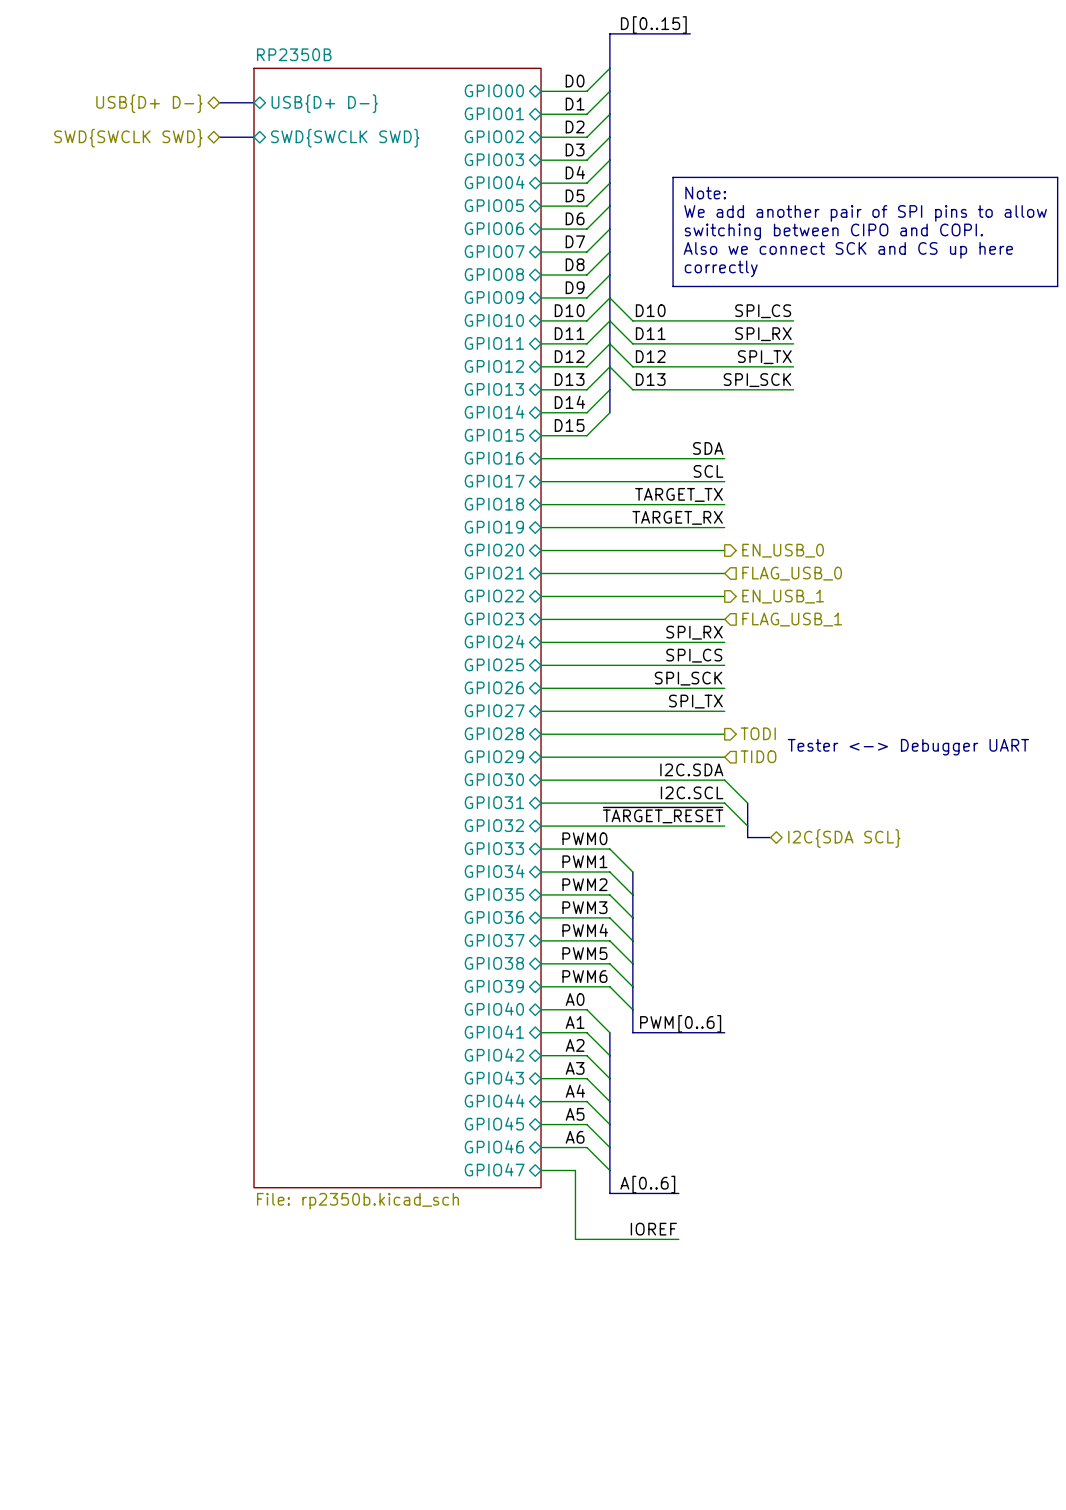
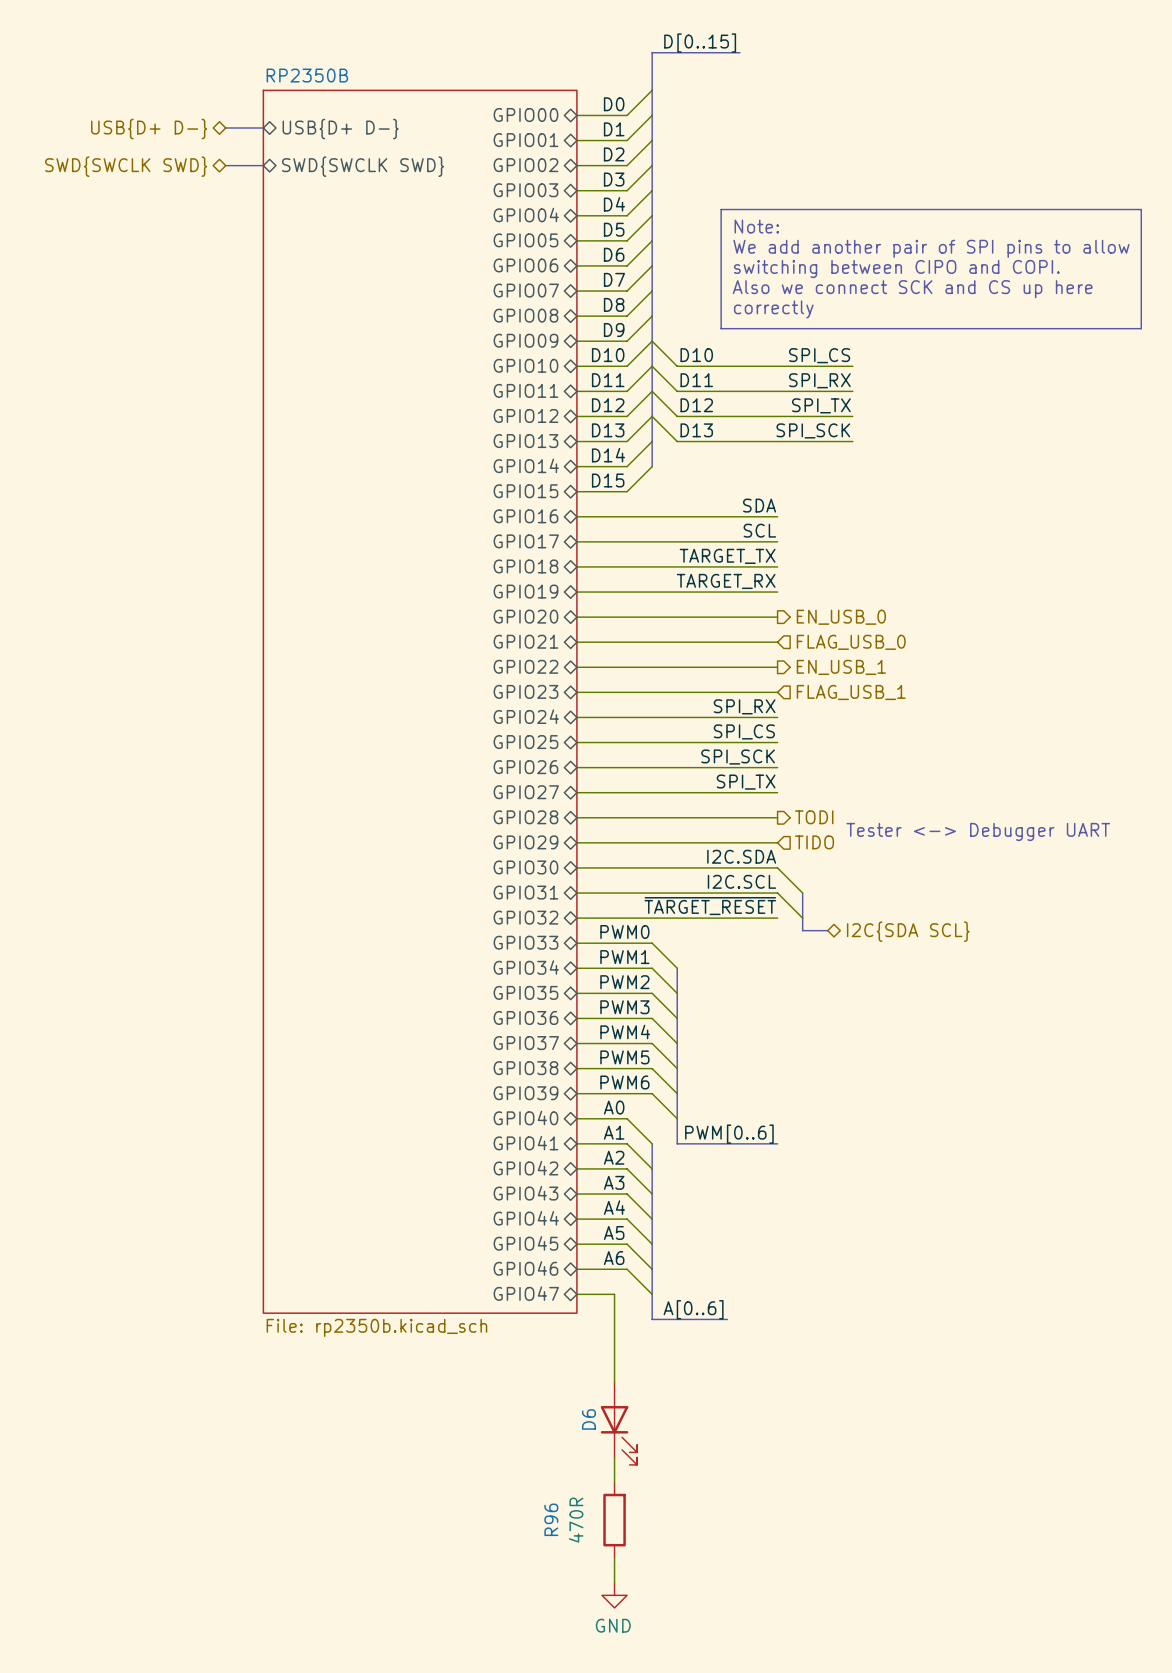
label: IOREF (653, 1229) -> none
wire: (575, 1239) (678, 1239) -> (614, 1369) (614, 1382)
D6: none -> (618, 1423)
wire: none -> (614, 1457) (614, 1482)
R96: none -> 470R (614, 1520)
wire: none -> (614, 1557) (614, 1582)
power symbol: none -> GND (614, 1595)

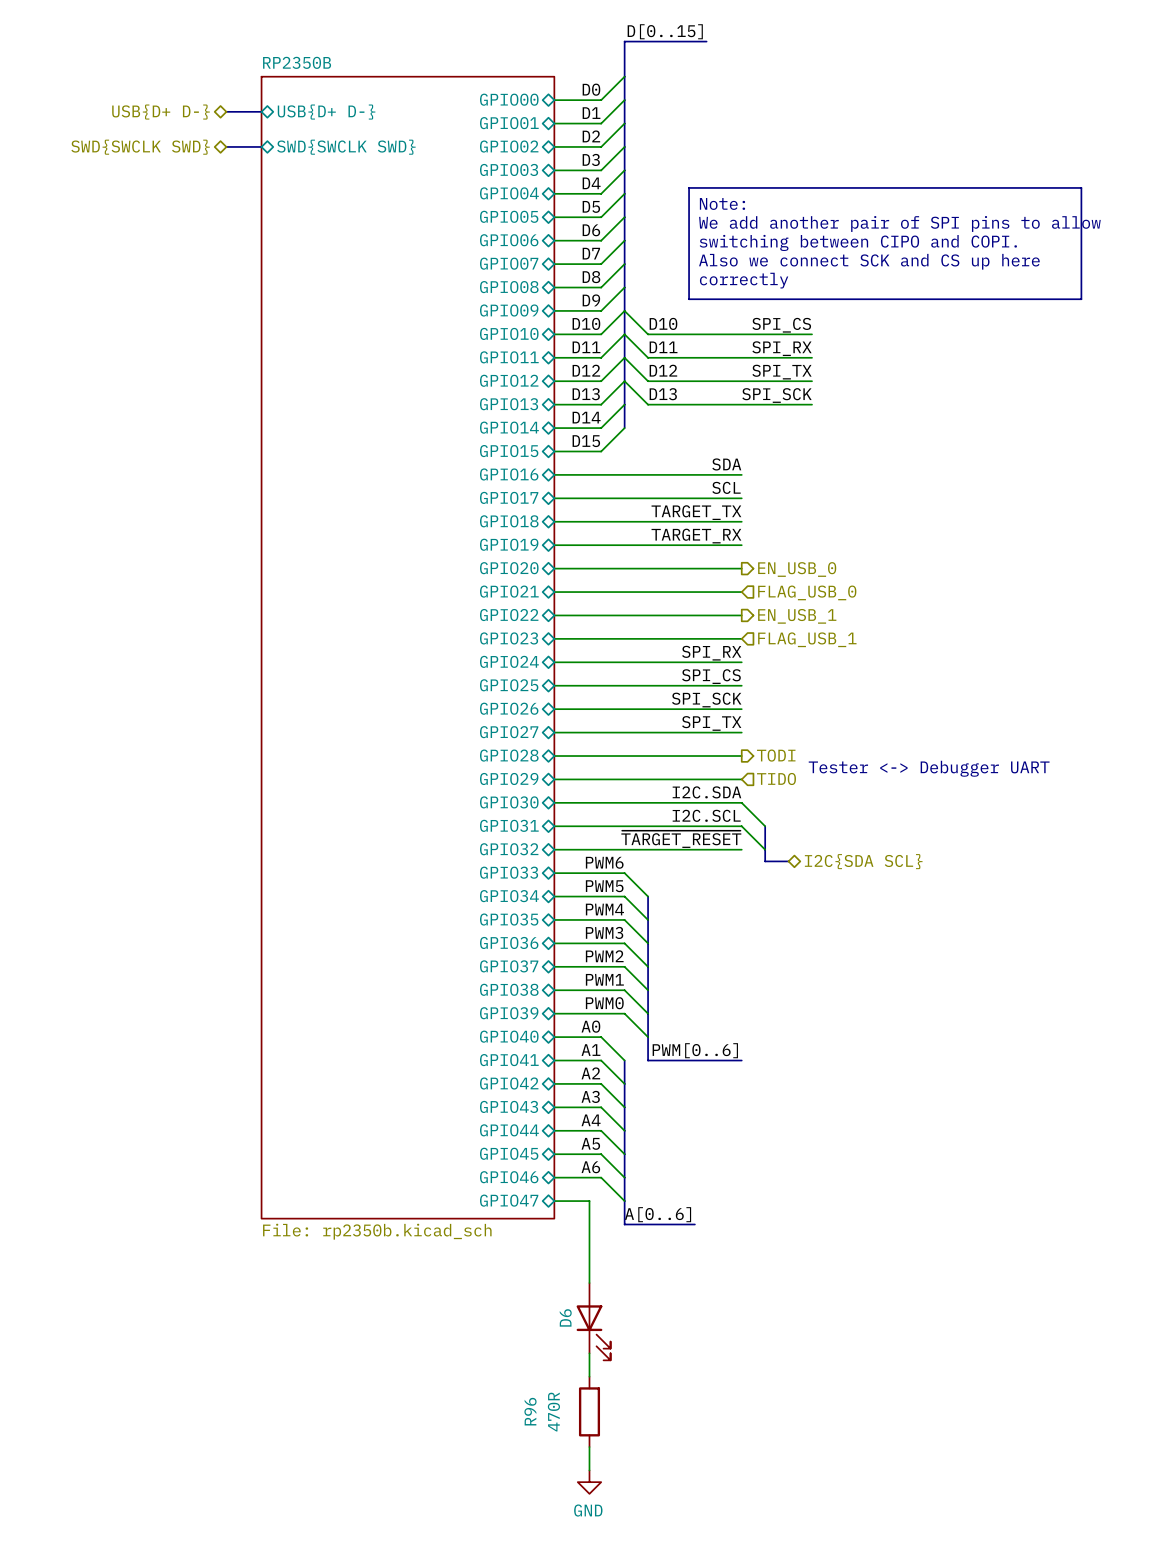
label: PWM0 (624, 932) -> PWM6 (604, 862)
label: PWM1 (624, 957) -> PWM5 (604, 886)
label: PWM2 (624, 982) -> PWM4 (604, 909)
label: PWM4 (625, 1032) -> PWM2 (604, 956)
label: PWM5 (624, 1057) -> PWM1 (604, 979)
label: PWM6 (624, 1082) -> PWM0 (604, 1003)

